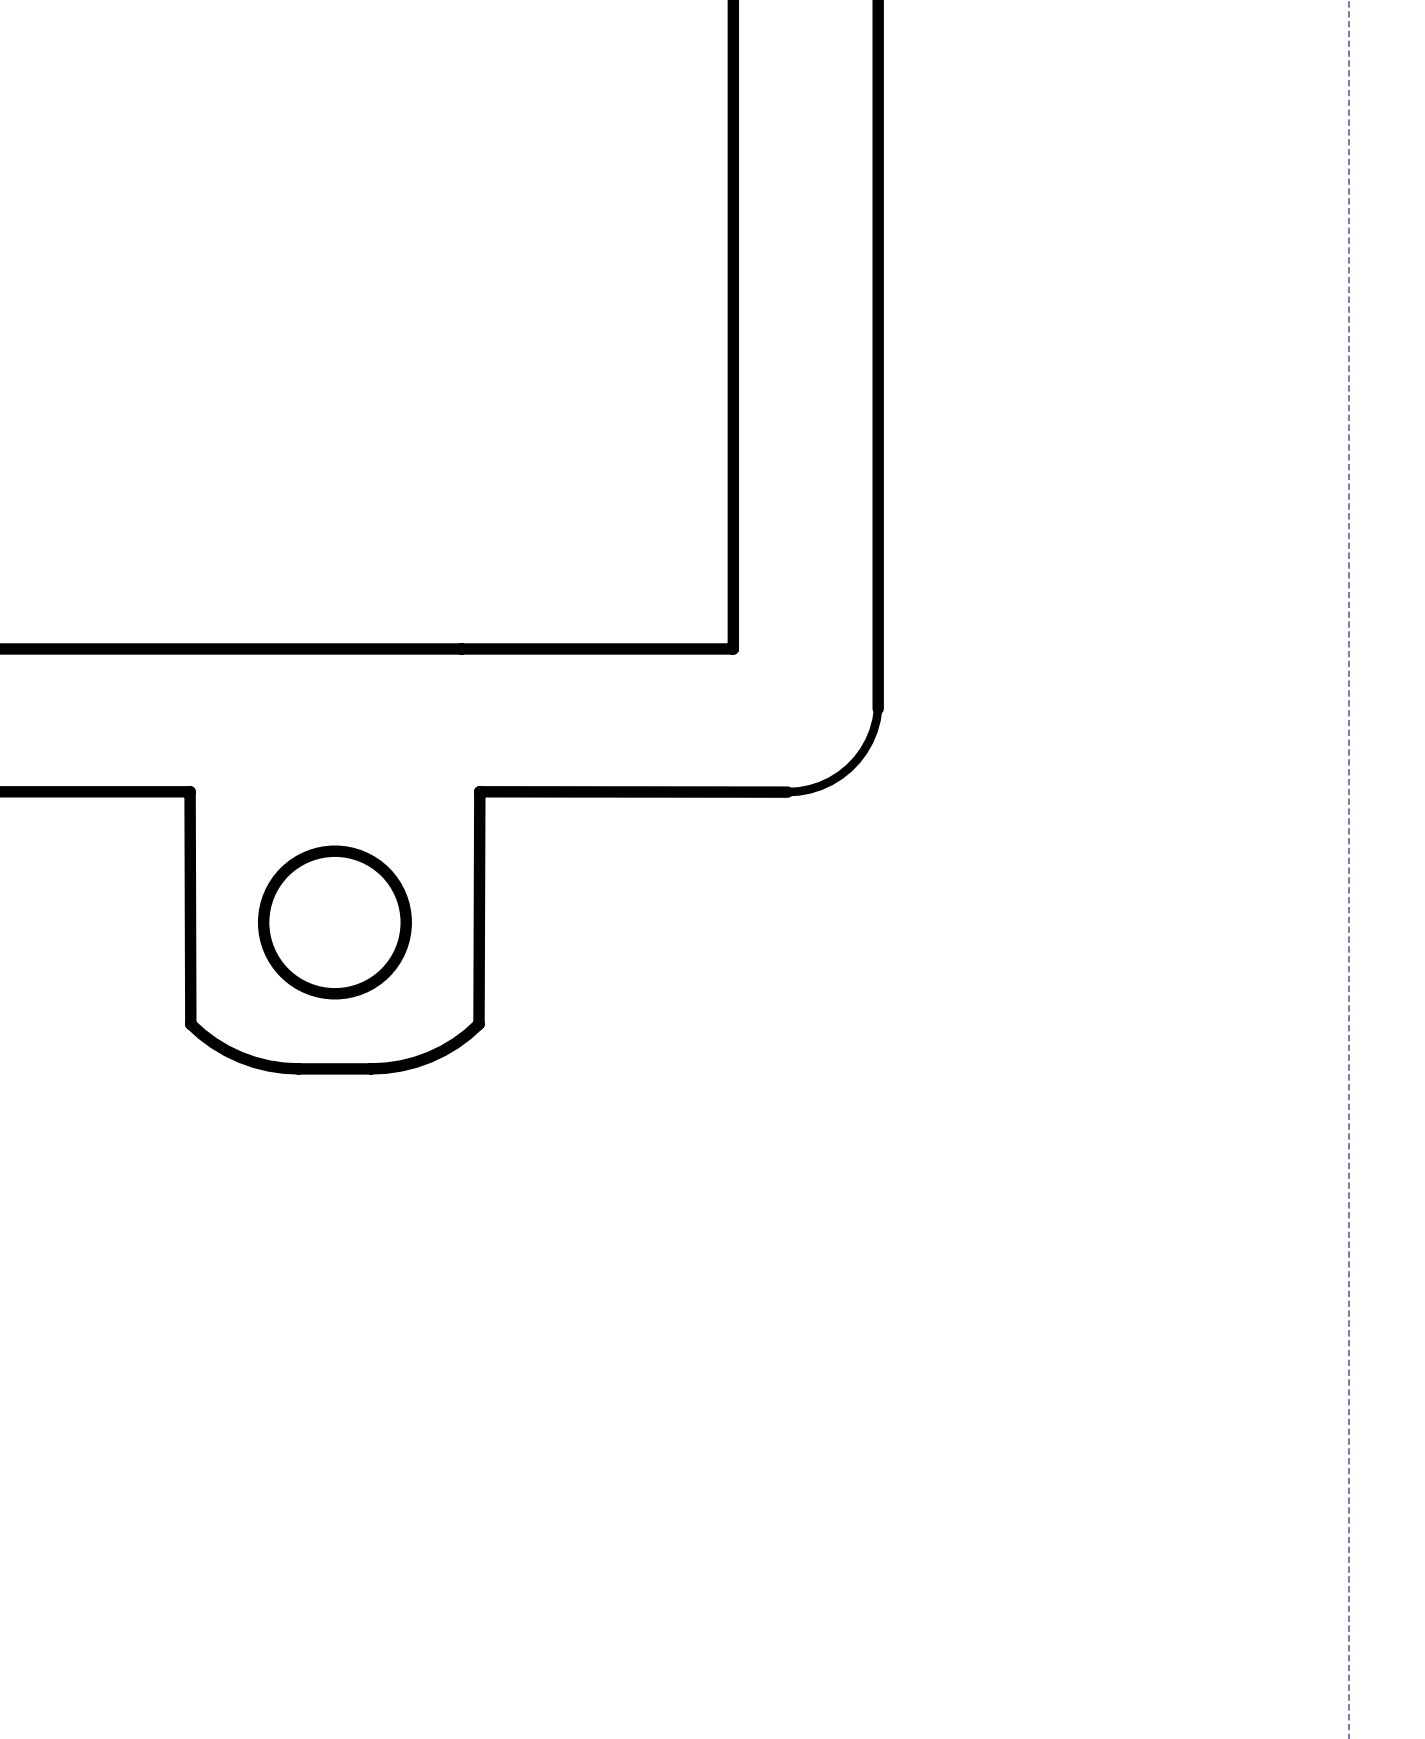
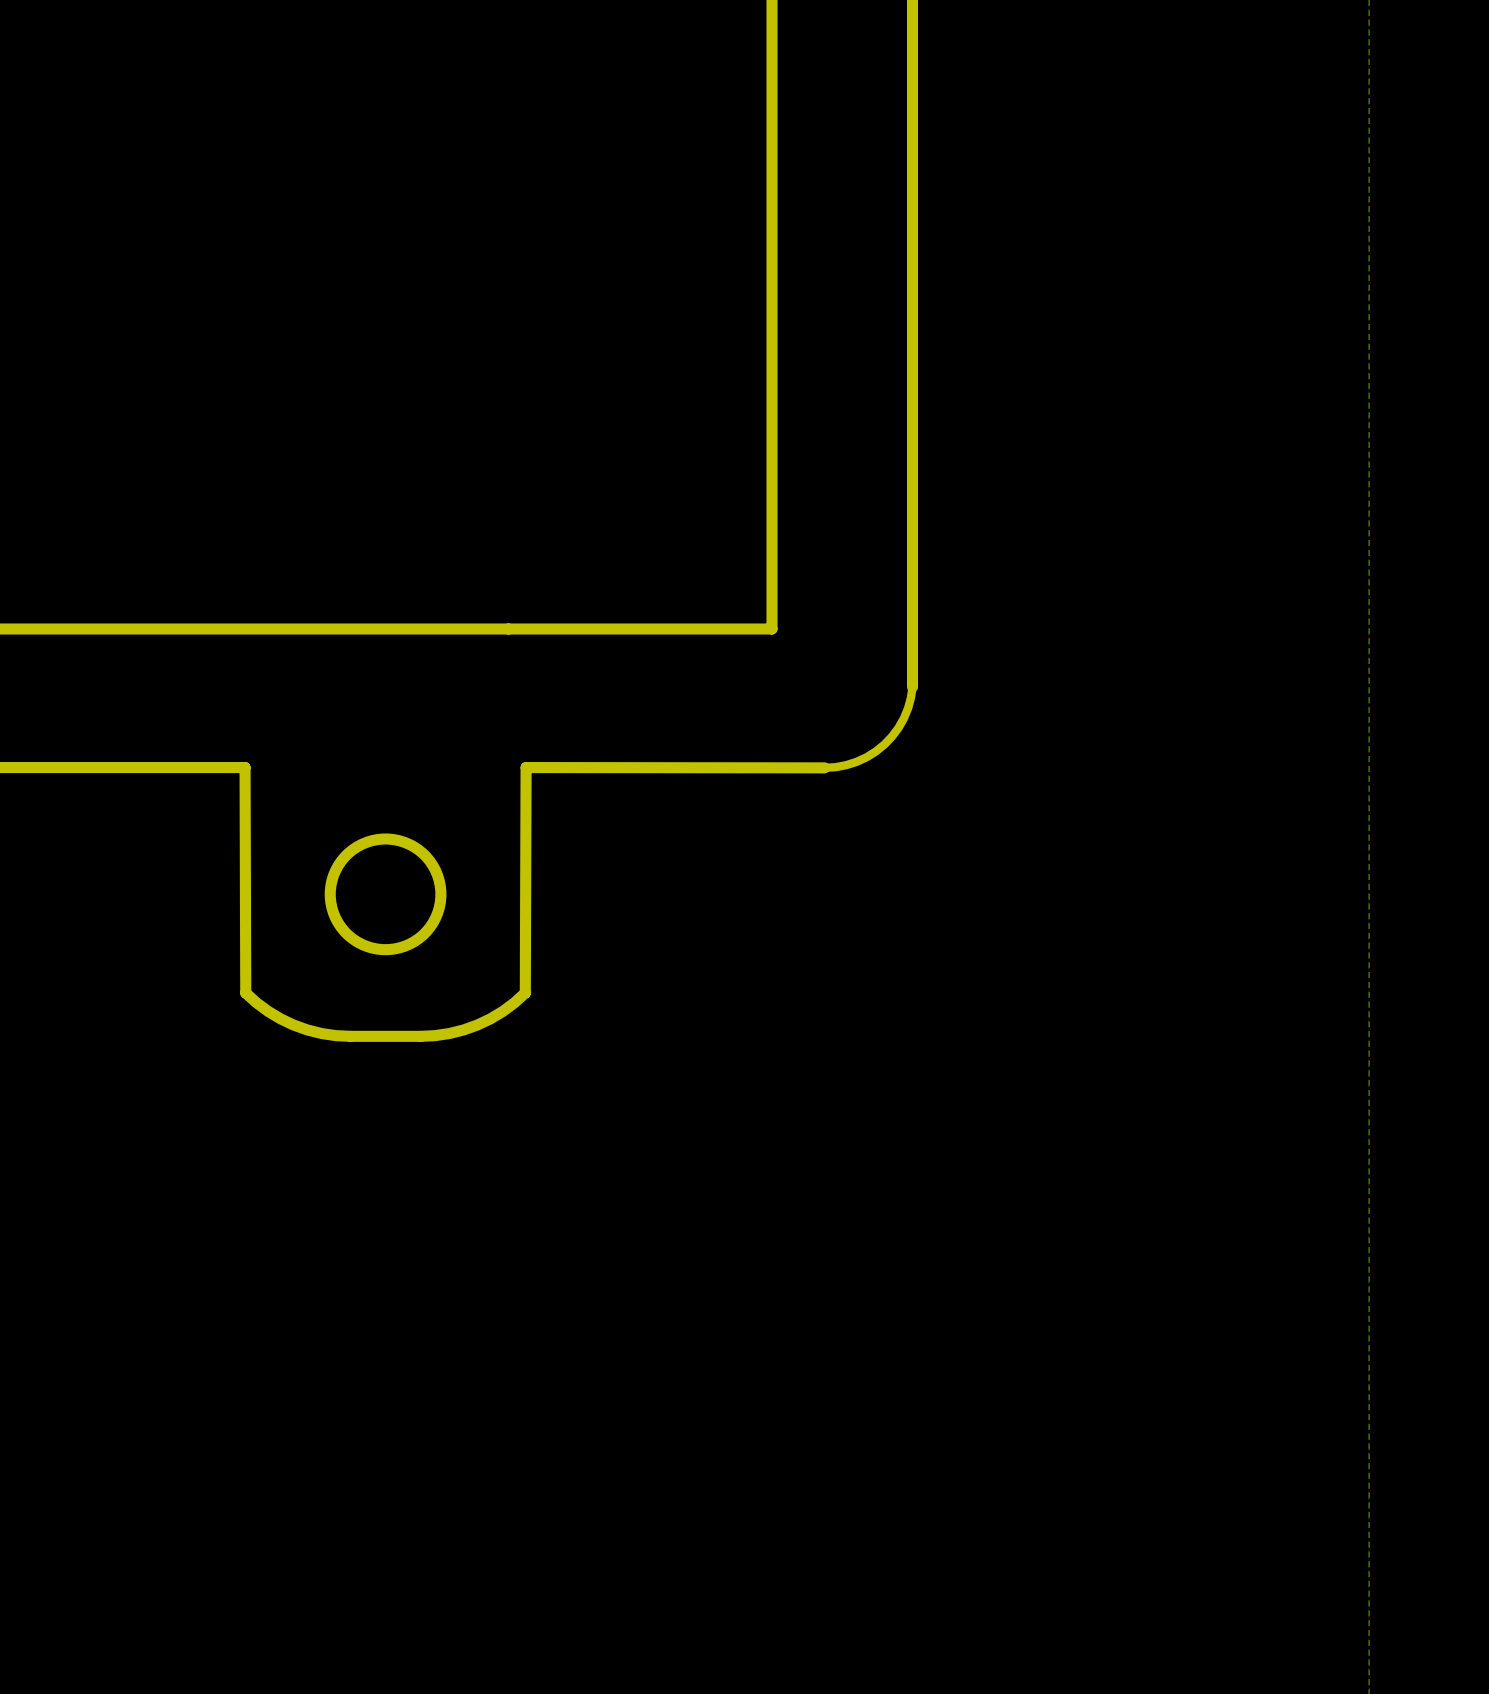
round board edge size: [257, 845, 412, 1000] -> [324, 833, 447, 956]

